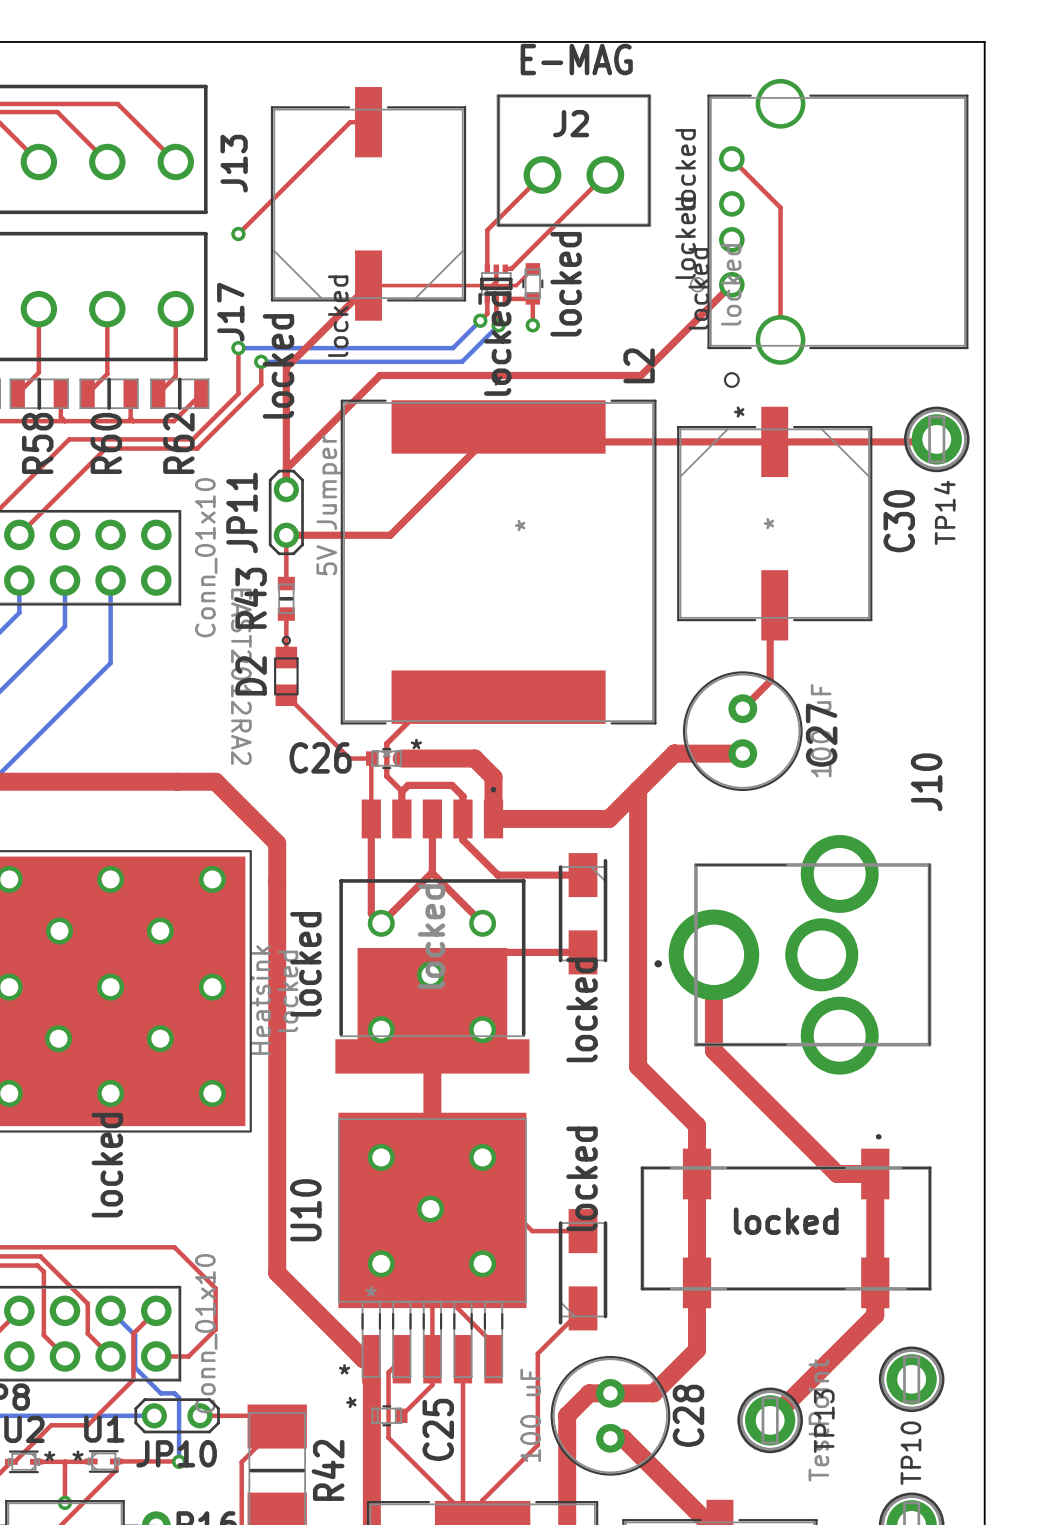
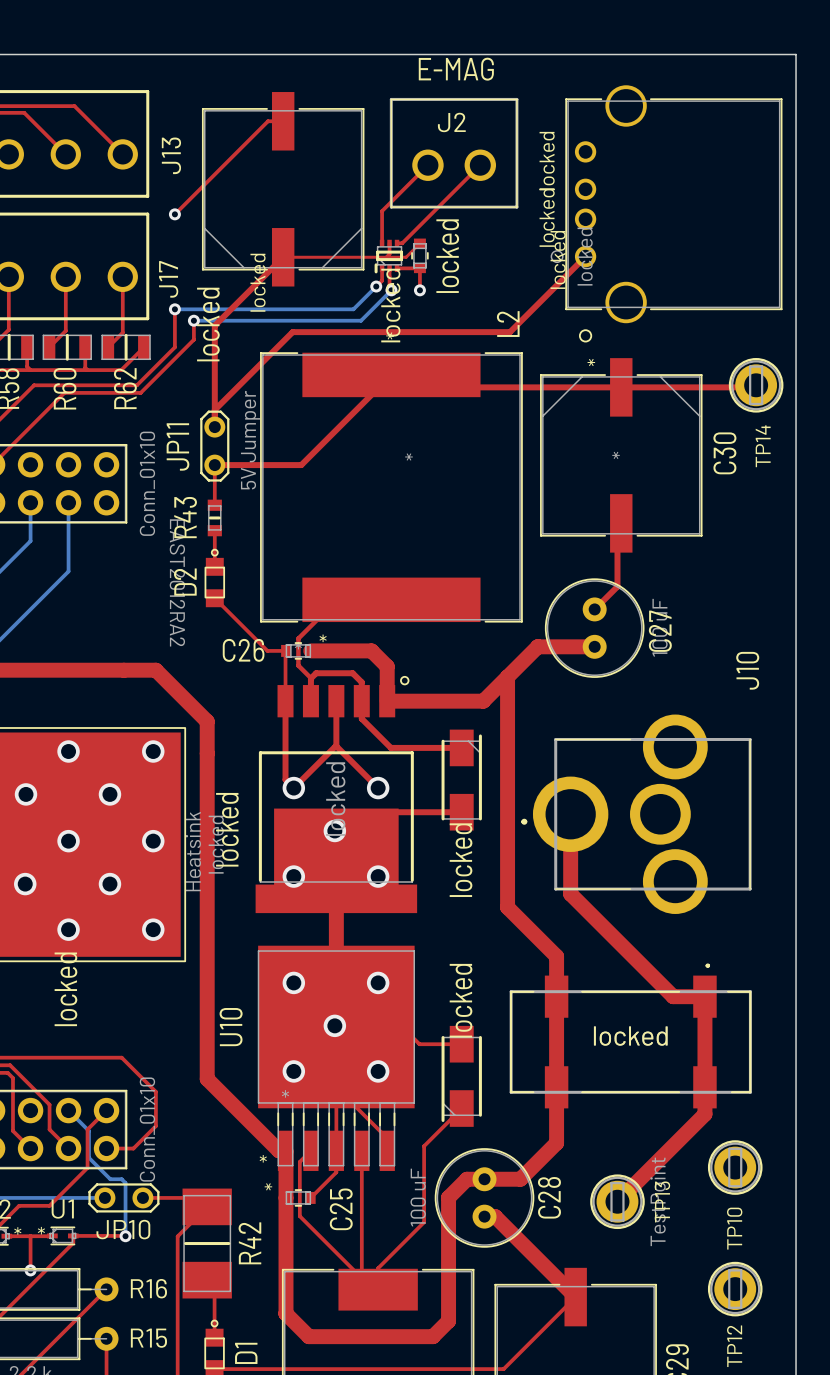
top track: (731, 158) (780, 207) (780, 339) -> none
locked footprint: [335, 786, 530, 1074] -> [255, 675, 418, 914]

